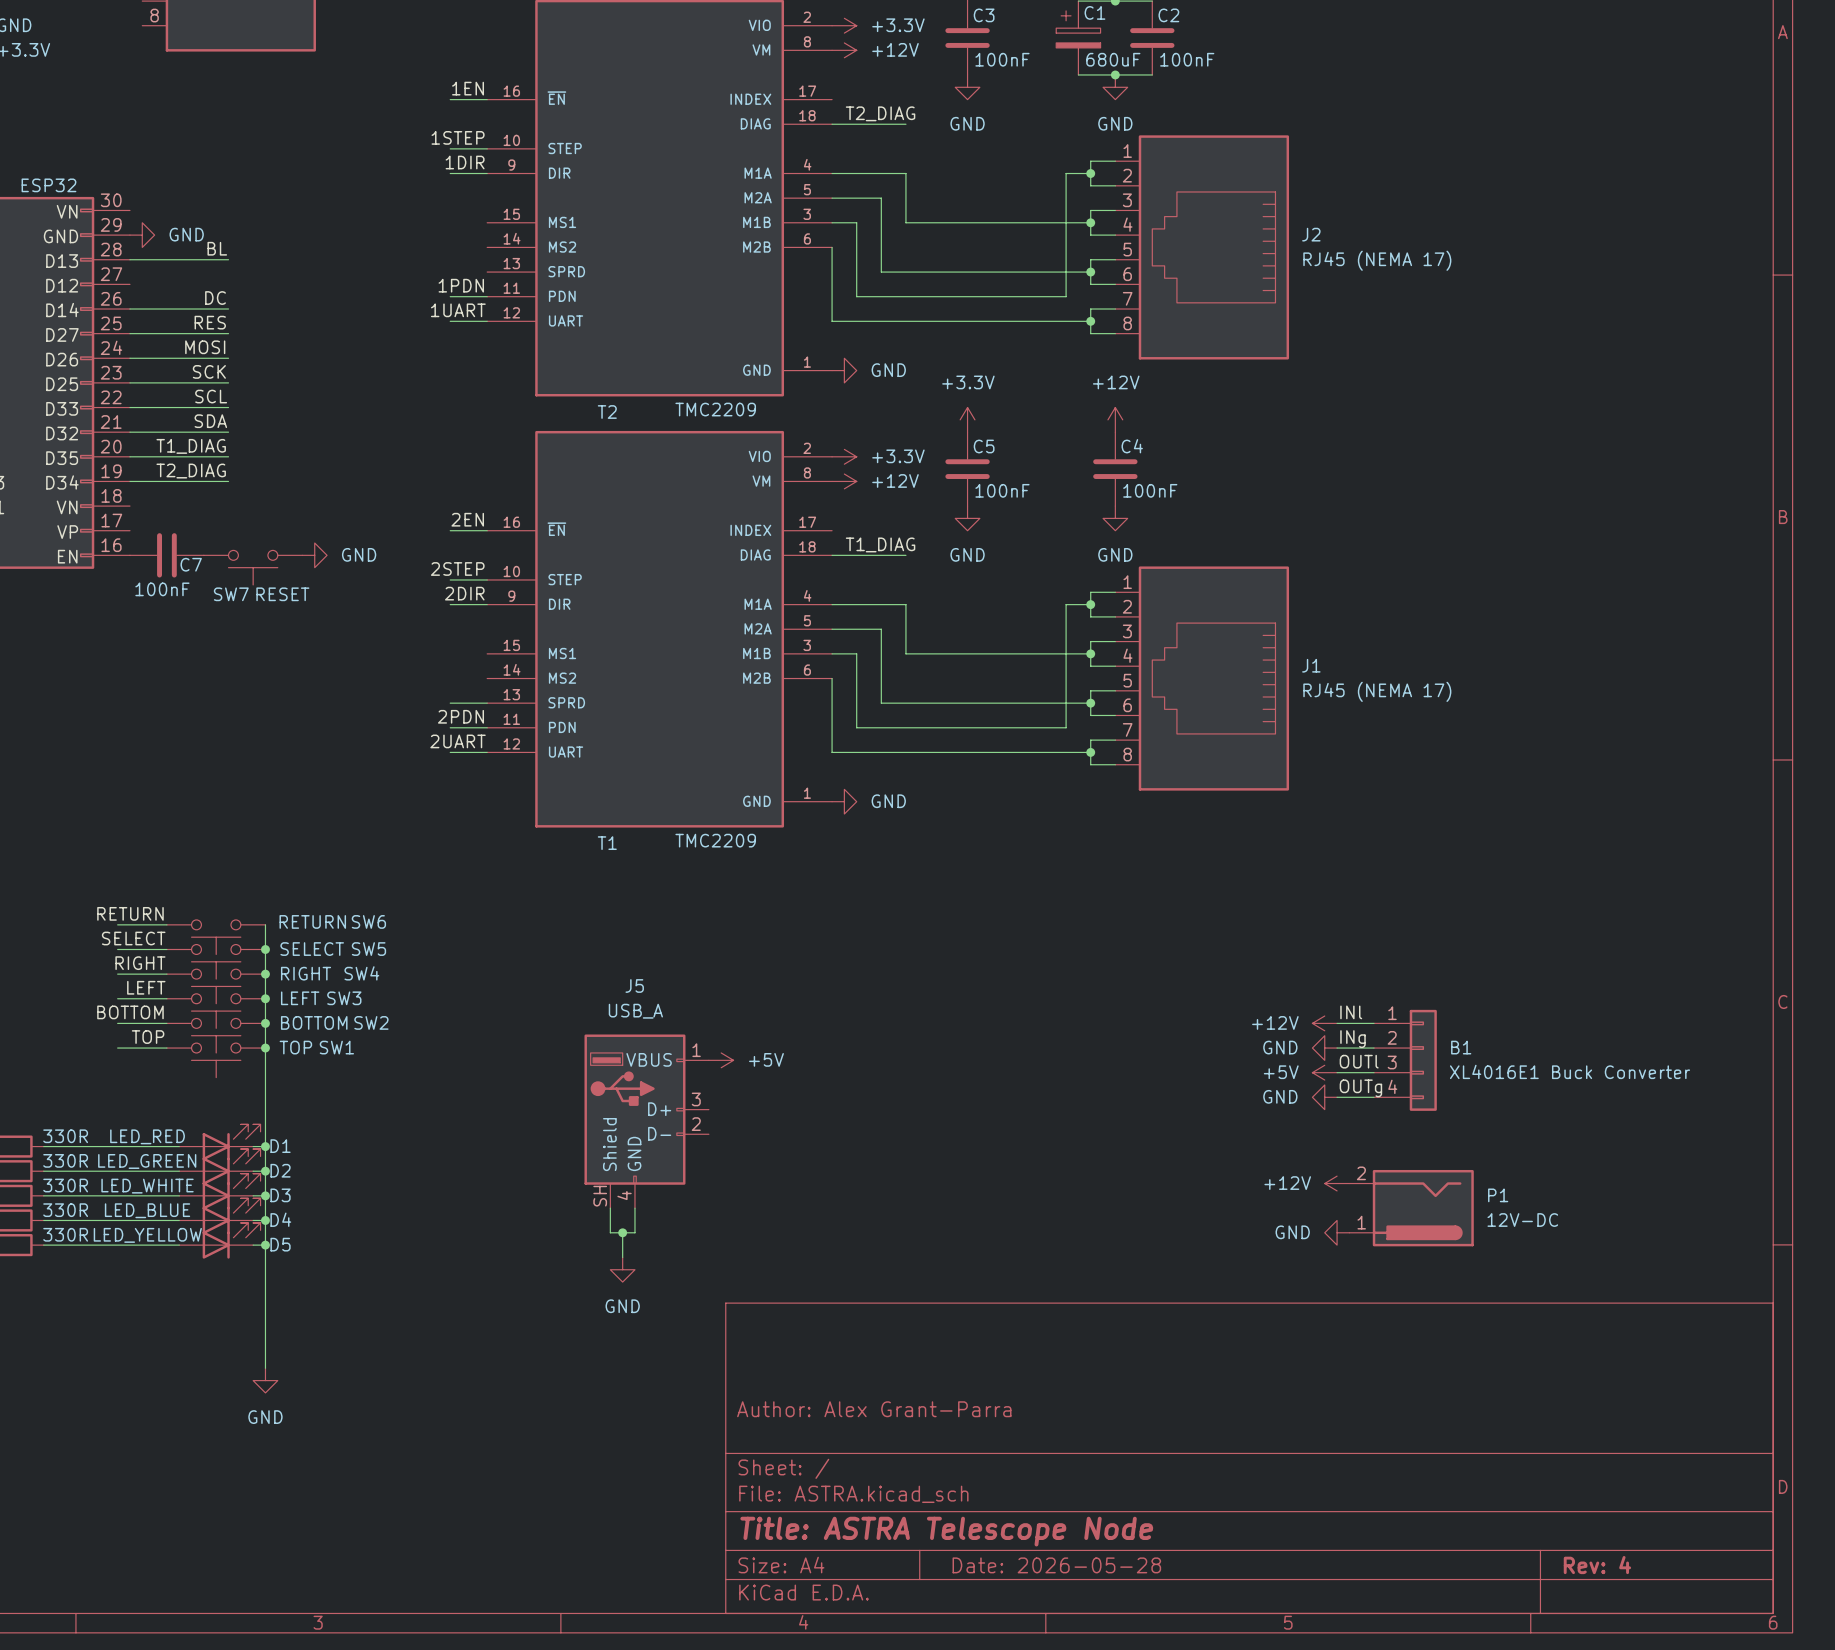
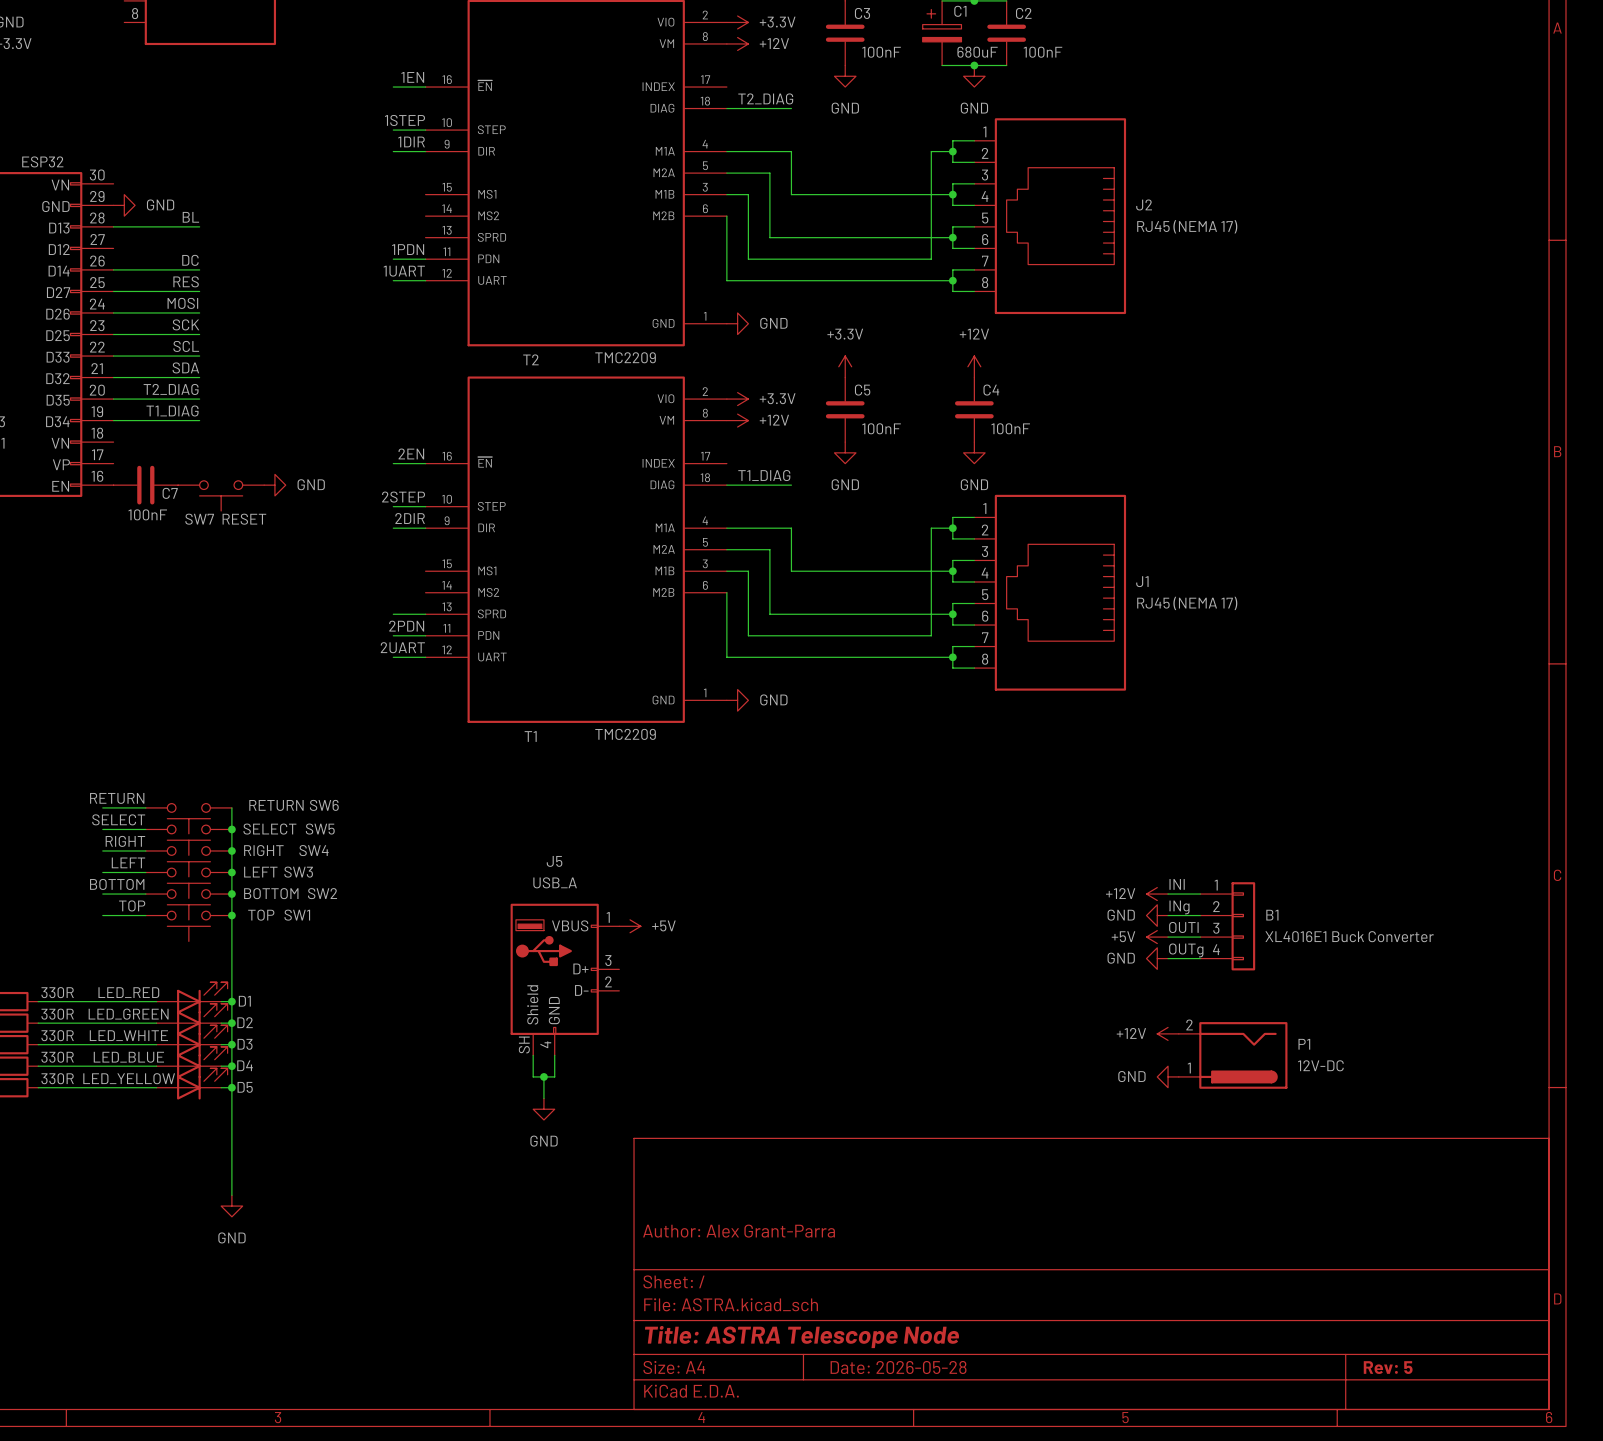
label: T1_DIAG (191, 446) -> T2_DIAG (171, 389)
label: T2_DIAG (191, 471) -> T1_DIAG (172, 410)
title block: Rev: 4 (1597, 1565) -> Rev: 5 (1388, 1367)

